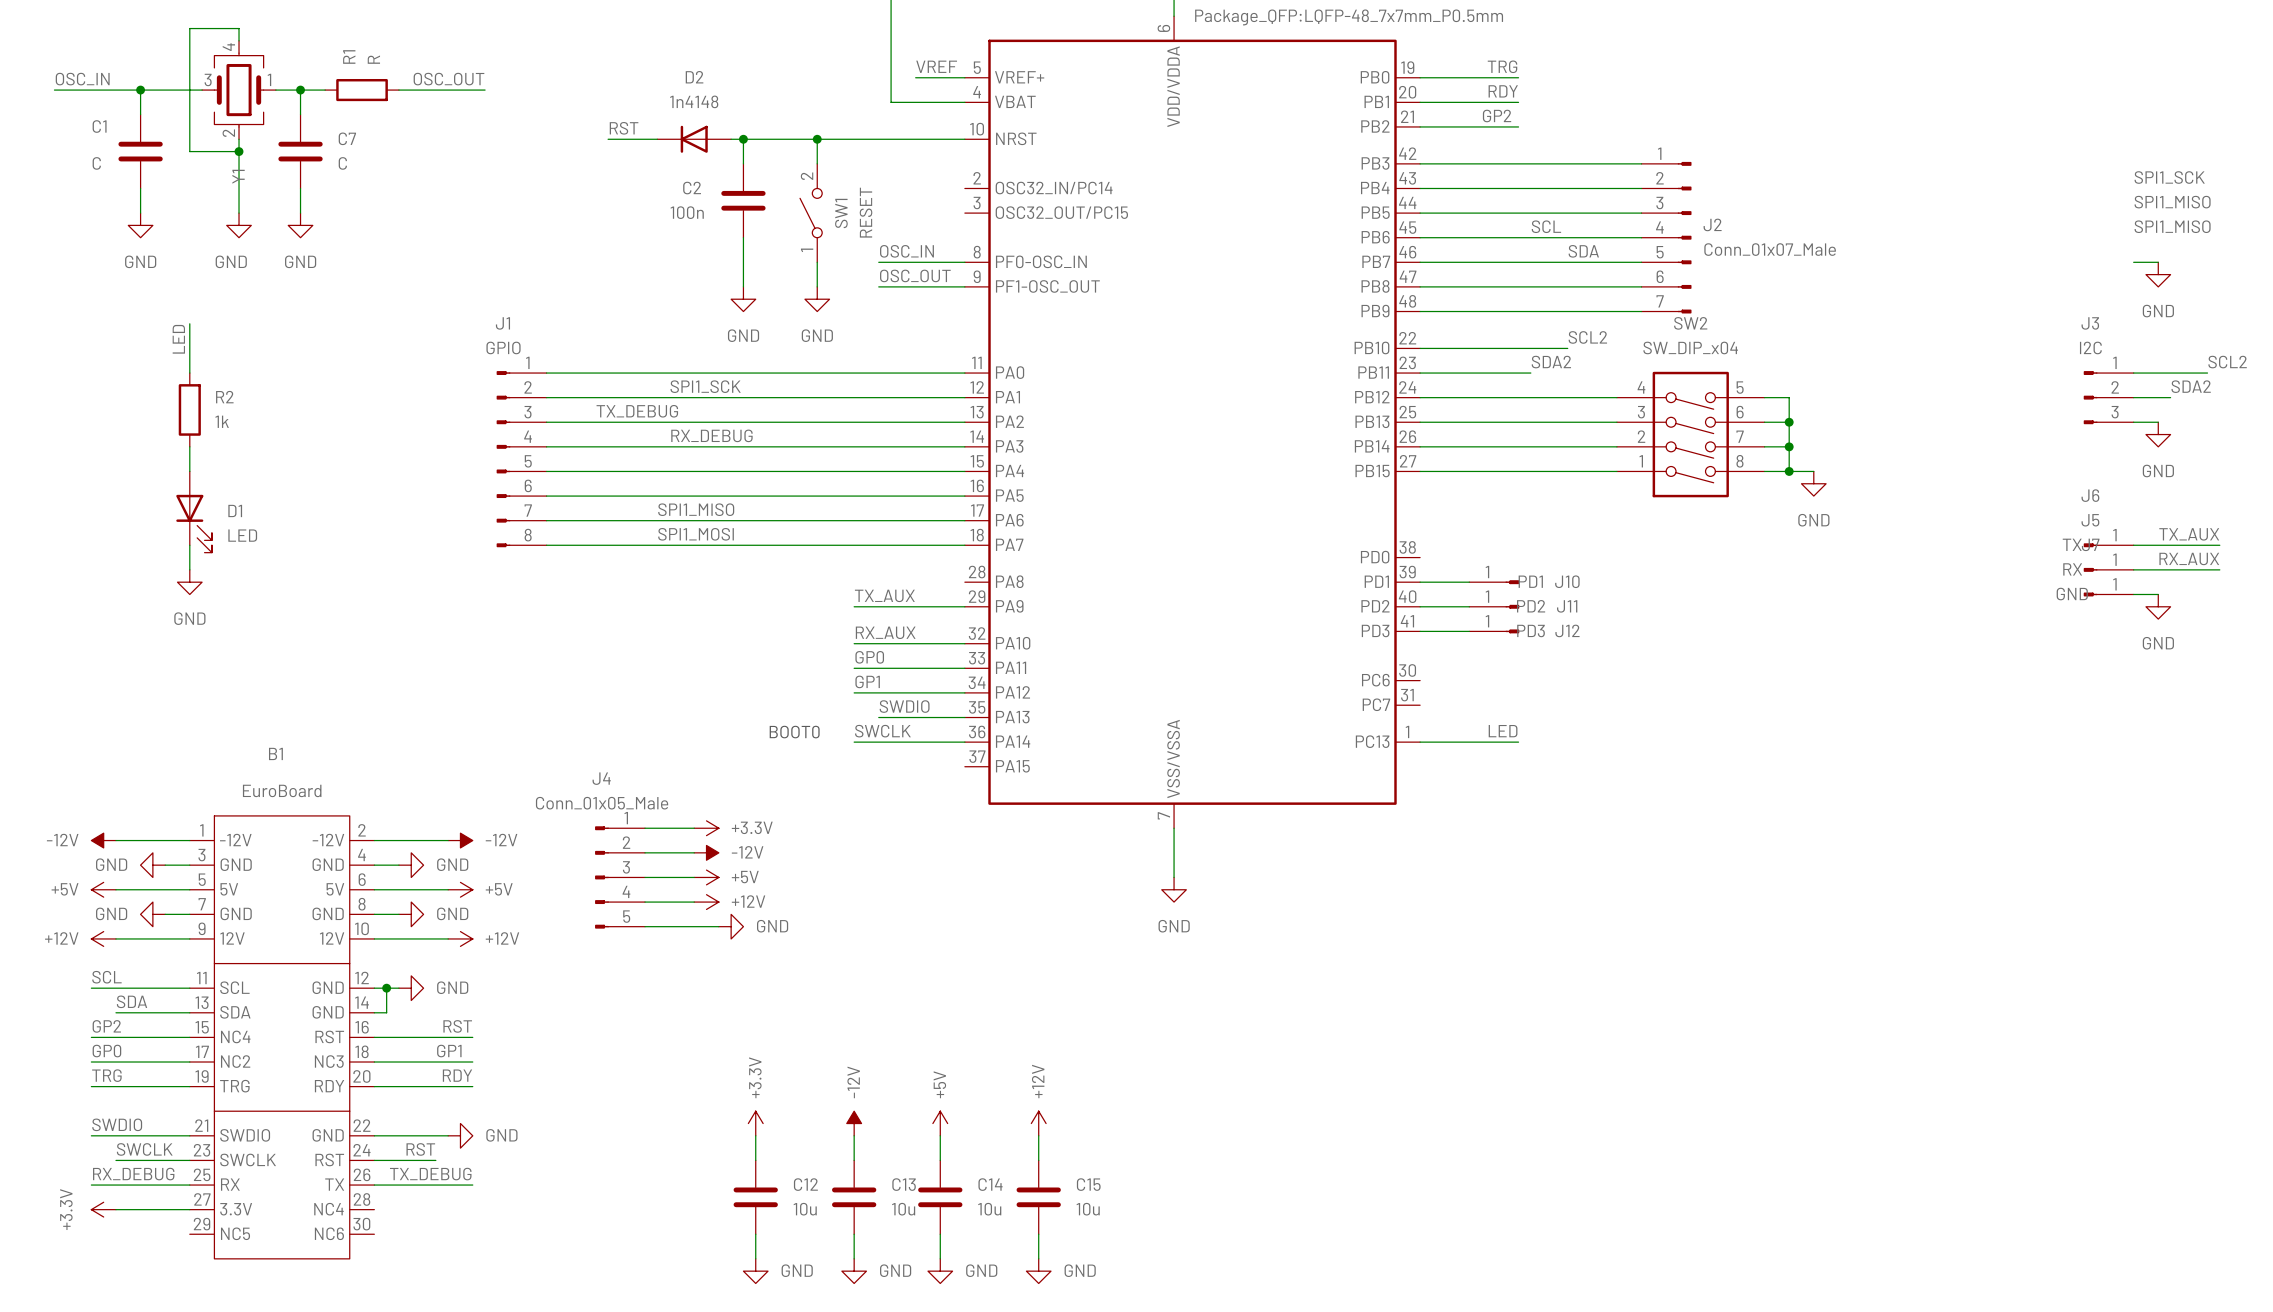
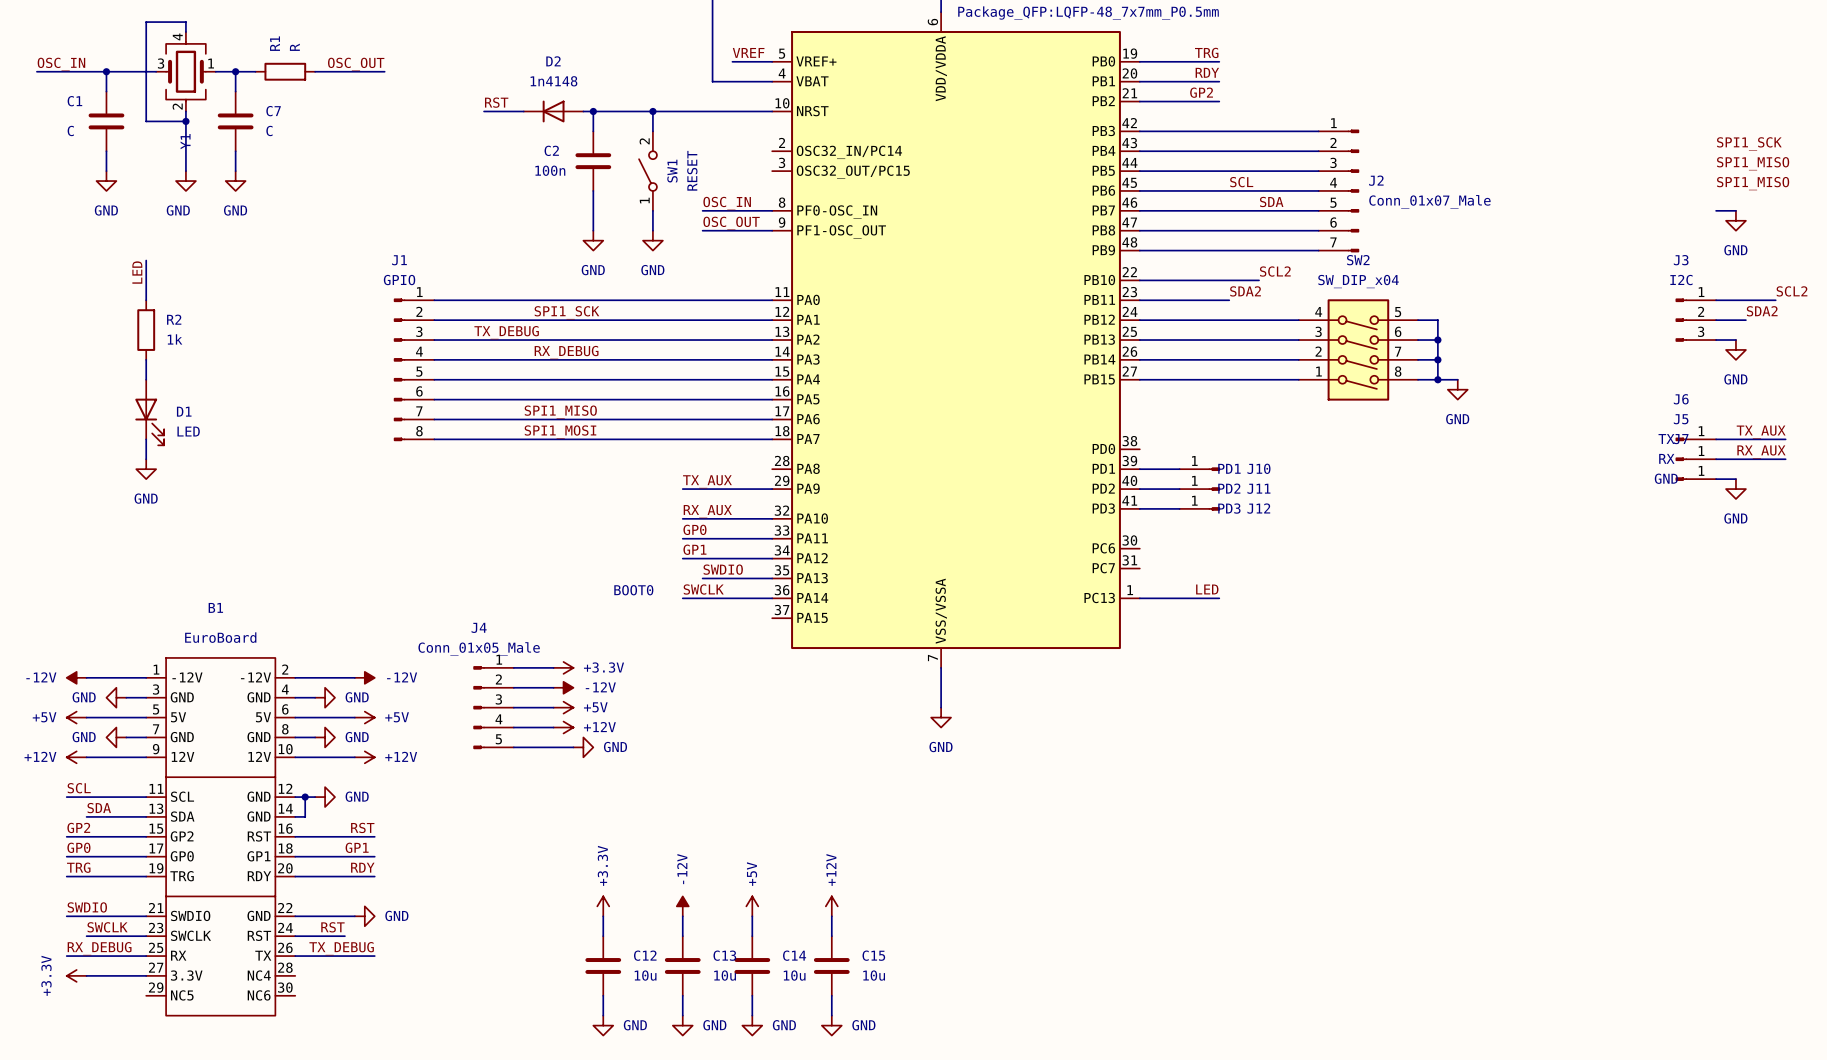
B1 pin name: NC4 (235, 1036) -> GP2 (182, 836)
B1 pin name: NC2 (235, 1061) -> GP0 (182, 856)
B1 pin name: NC3 (329, 1061) -> GP1 (258, 856)

